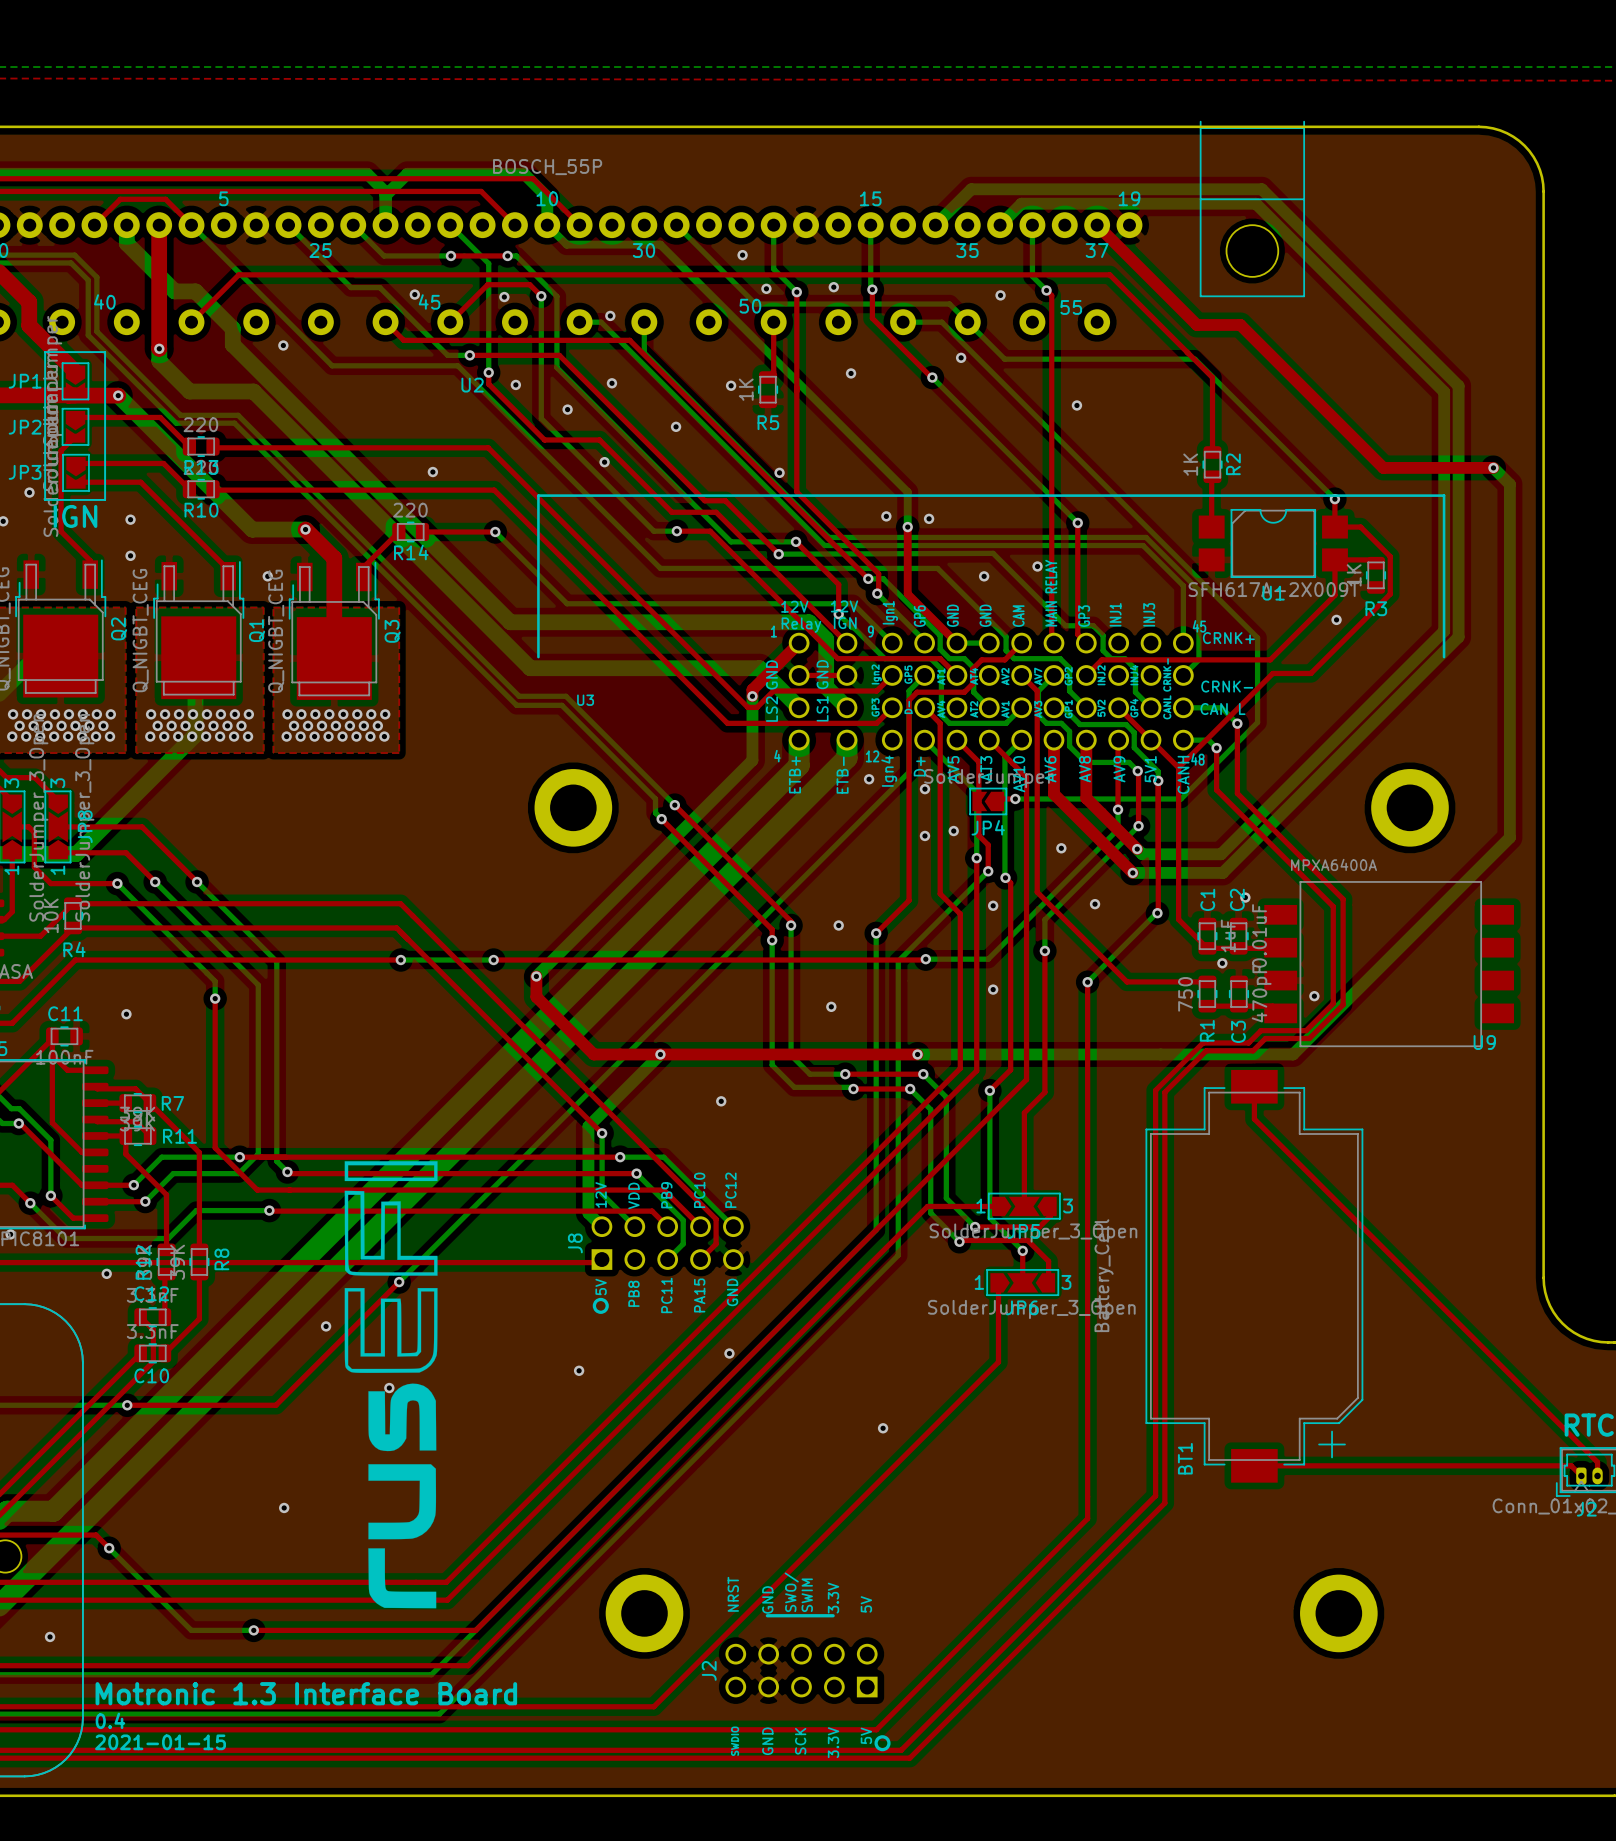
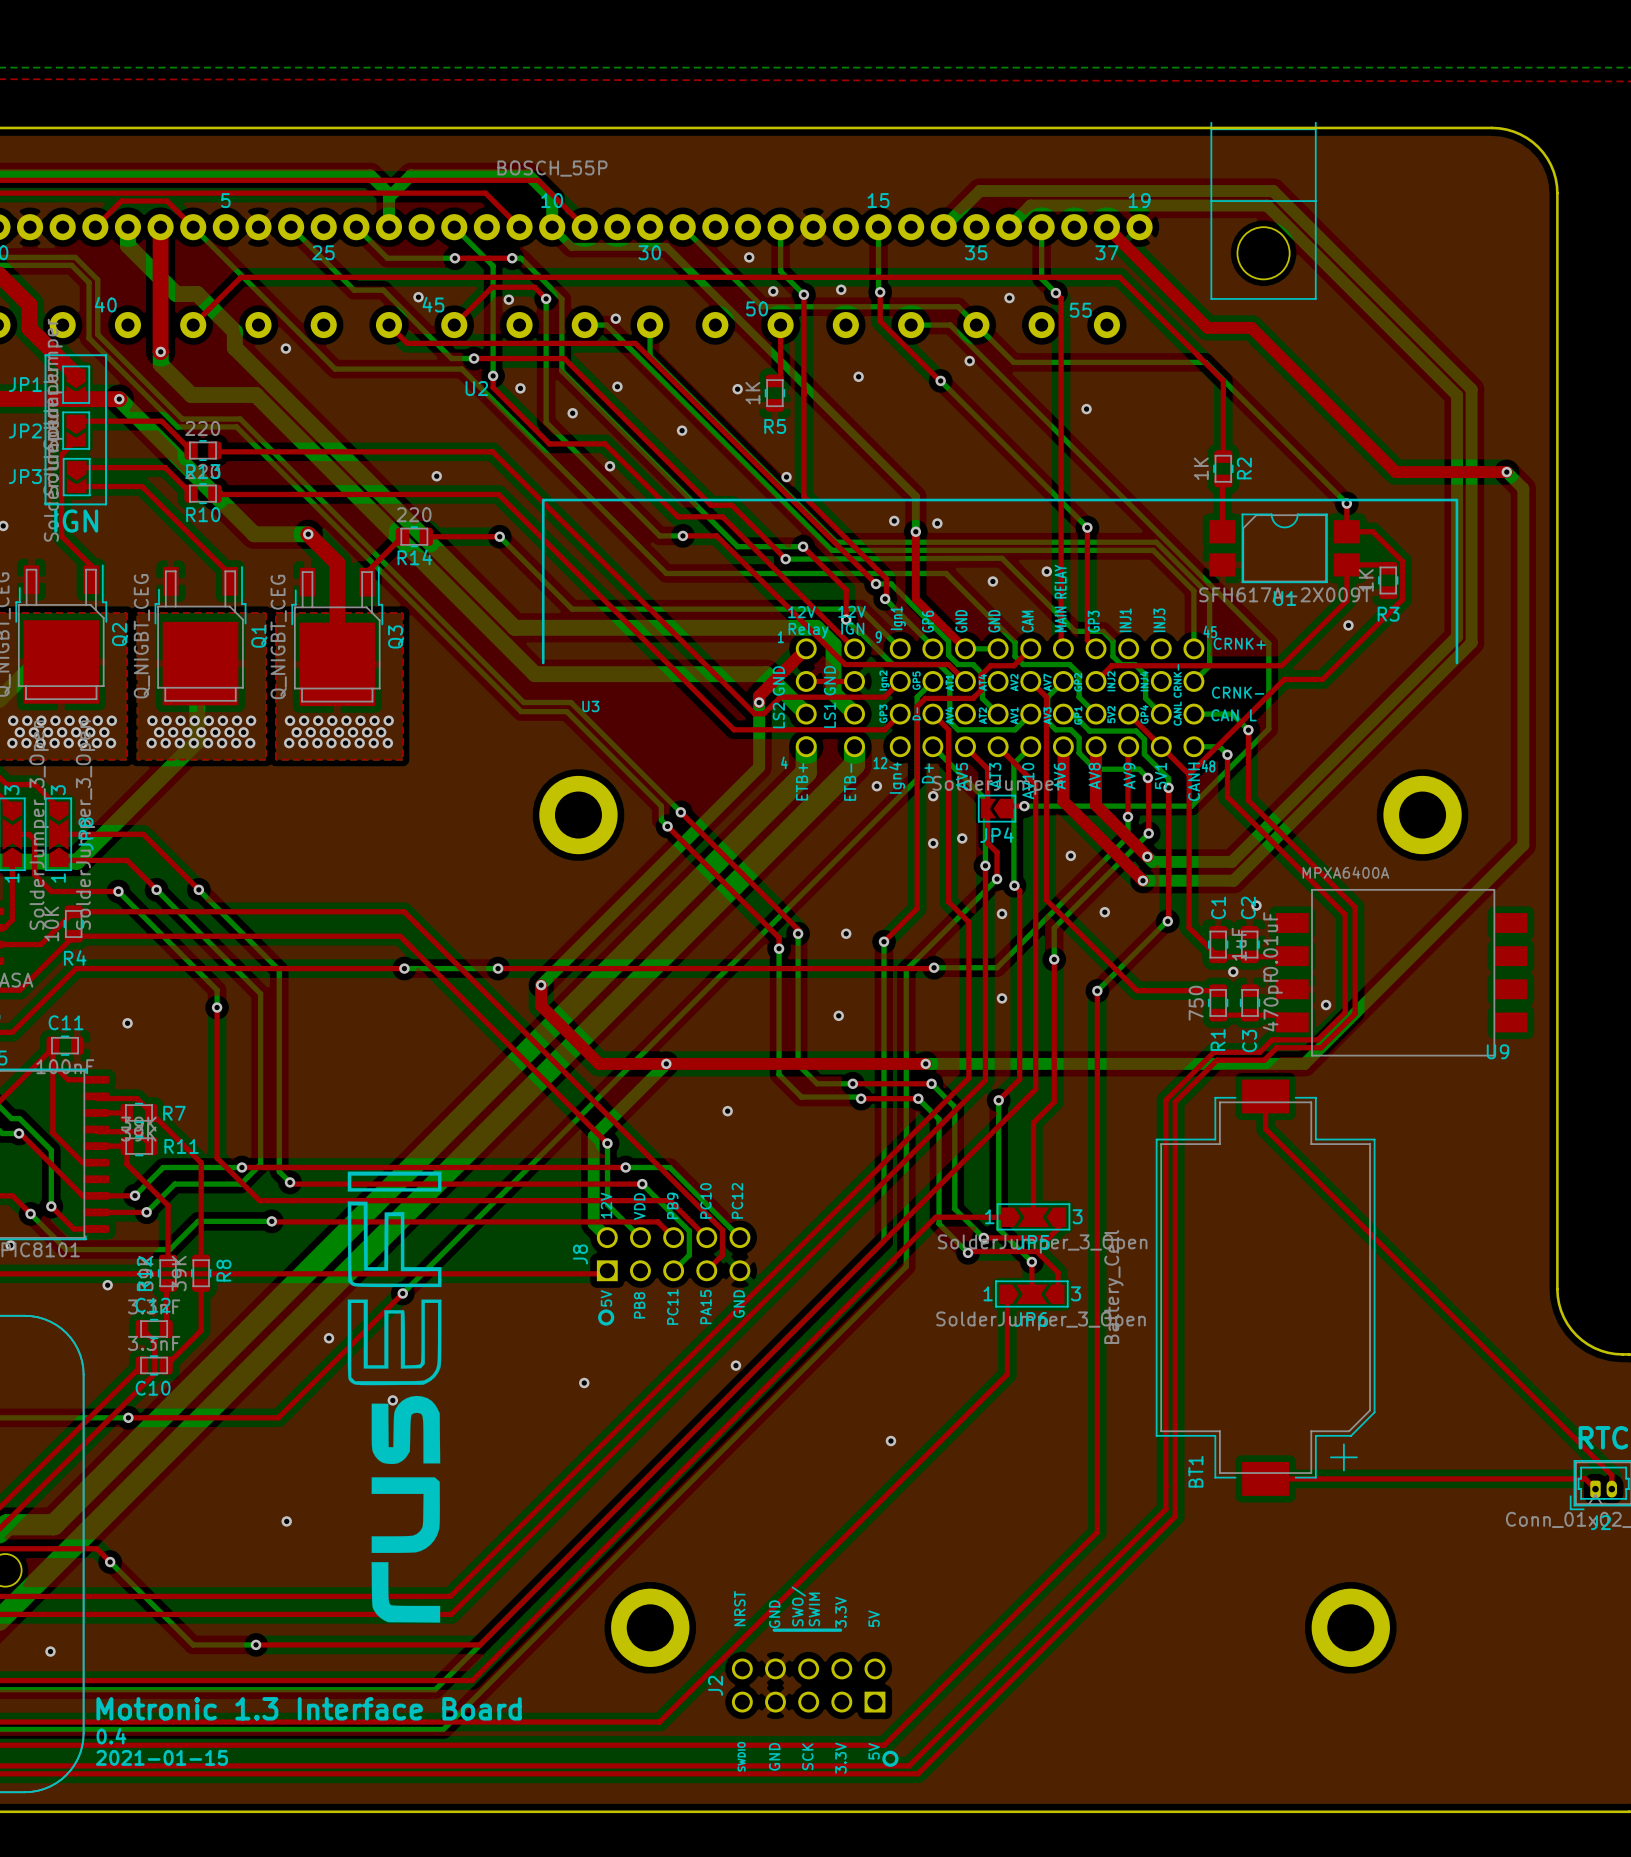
via: (29, 492) -> none
via: (130, 519) -> none
via: (130, 555) -> none
via: (267, 576) -> none

